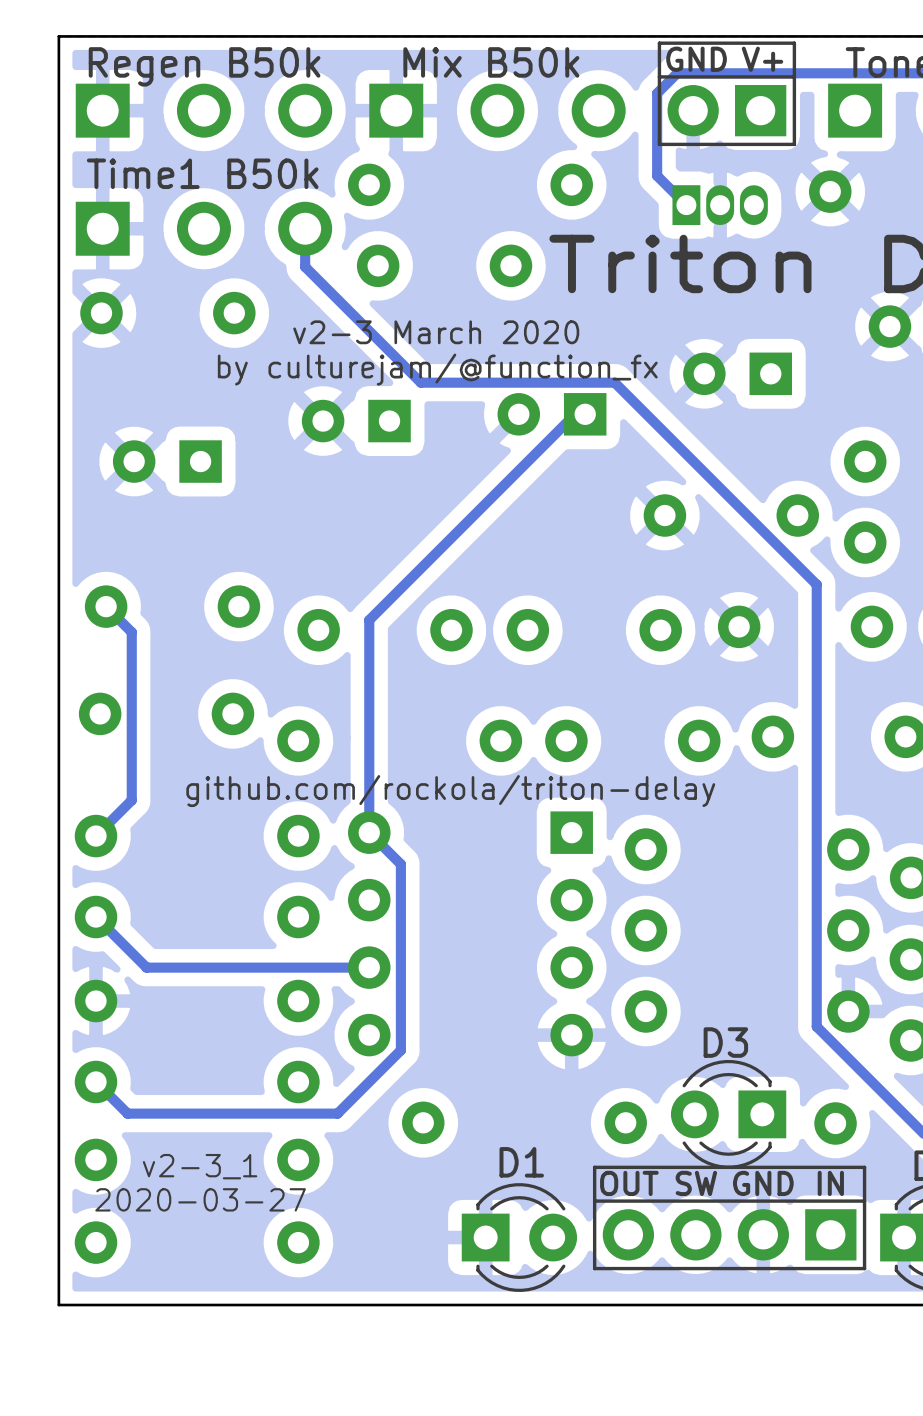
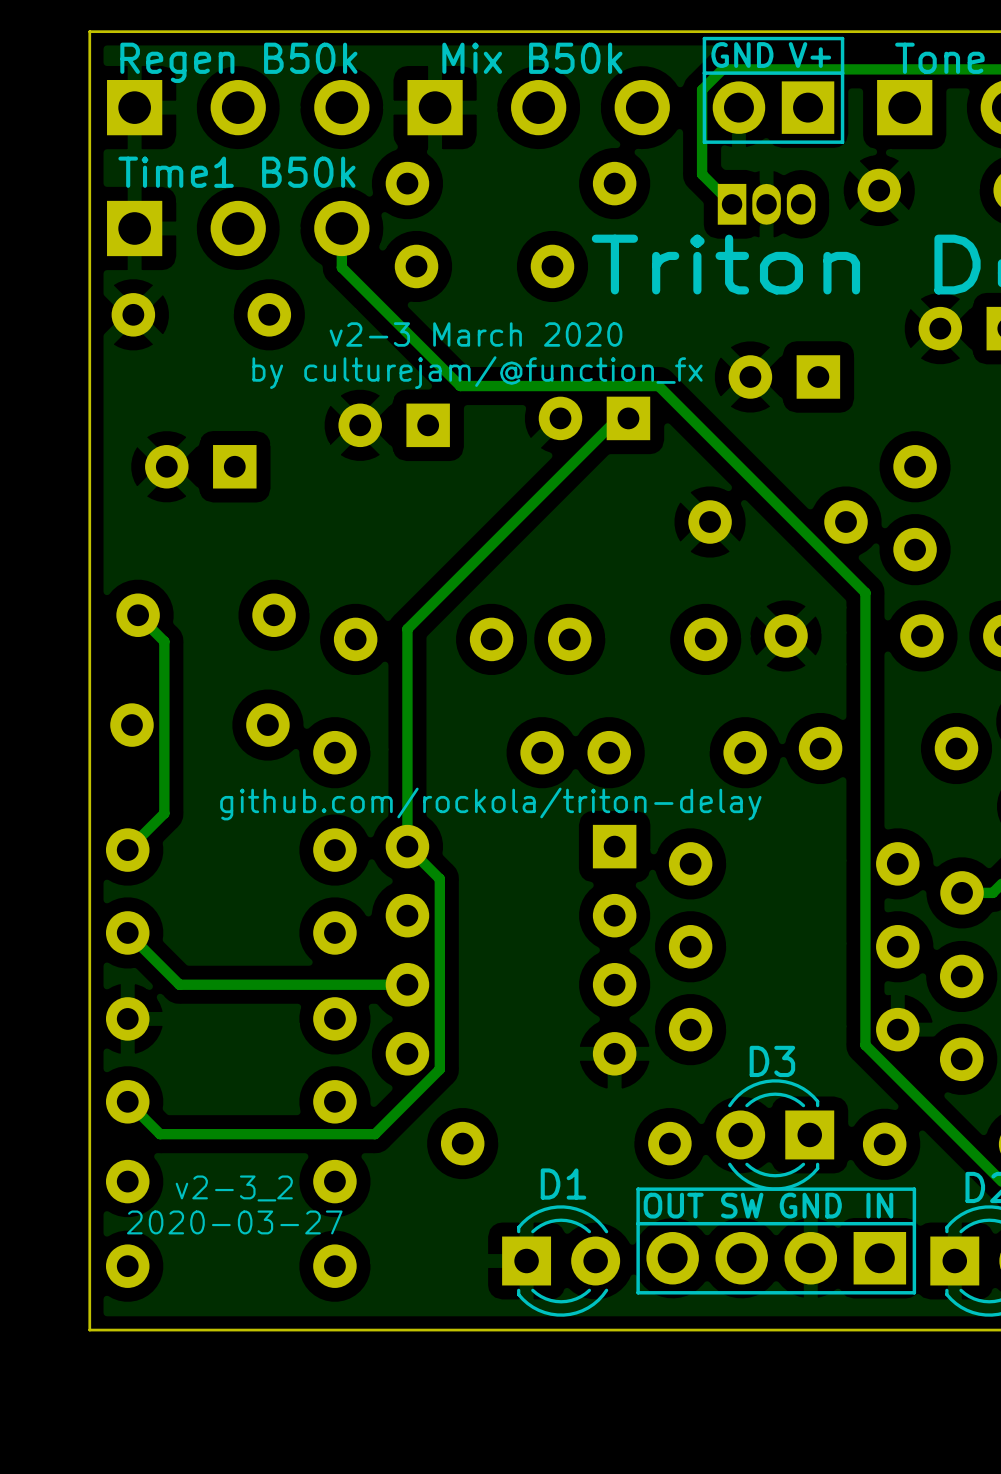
text: v2-3_1 (200, 1166) -> v2-3_2 (234, 1188)

